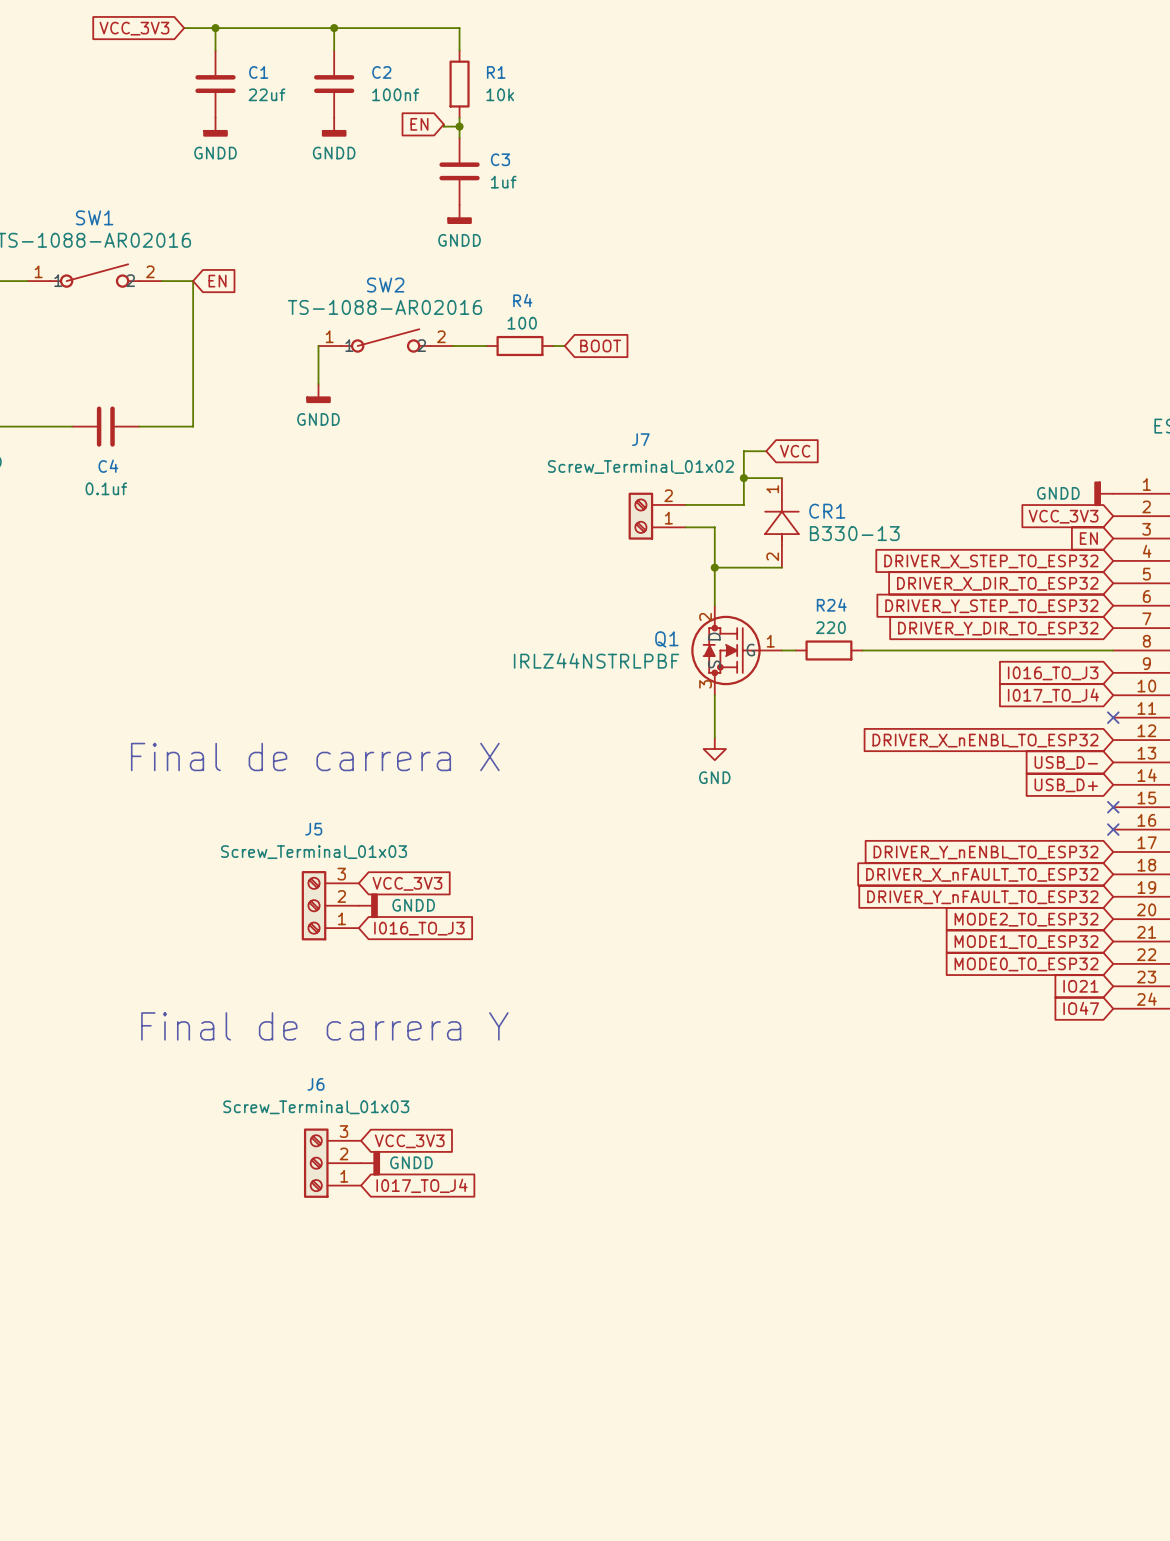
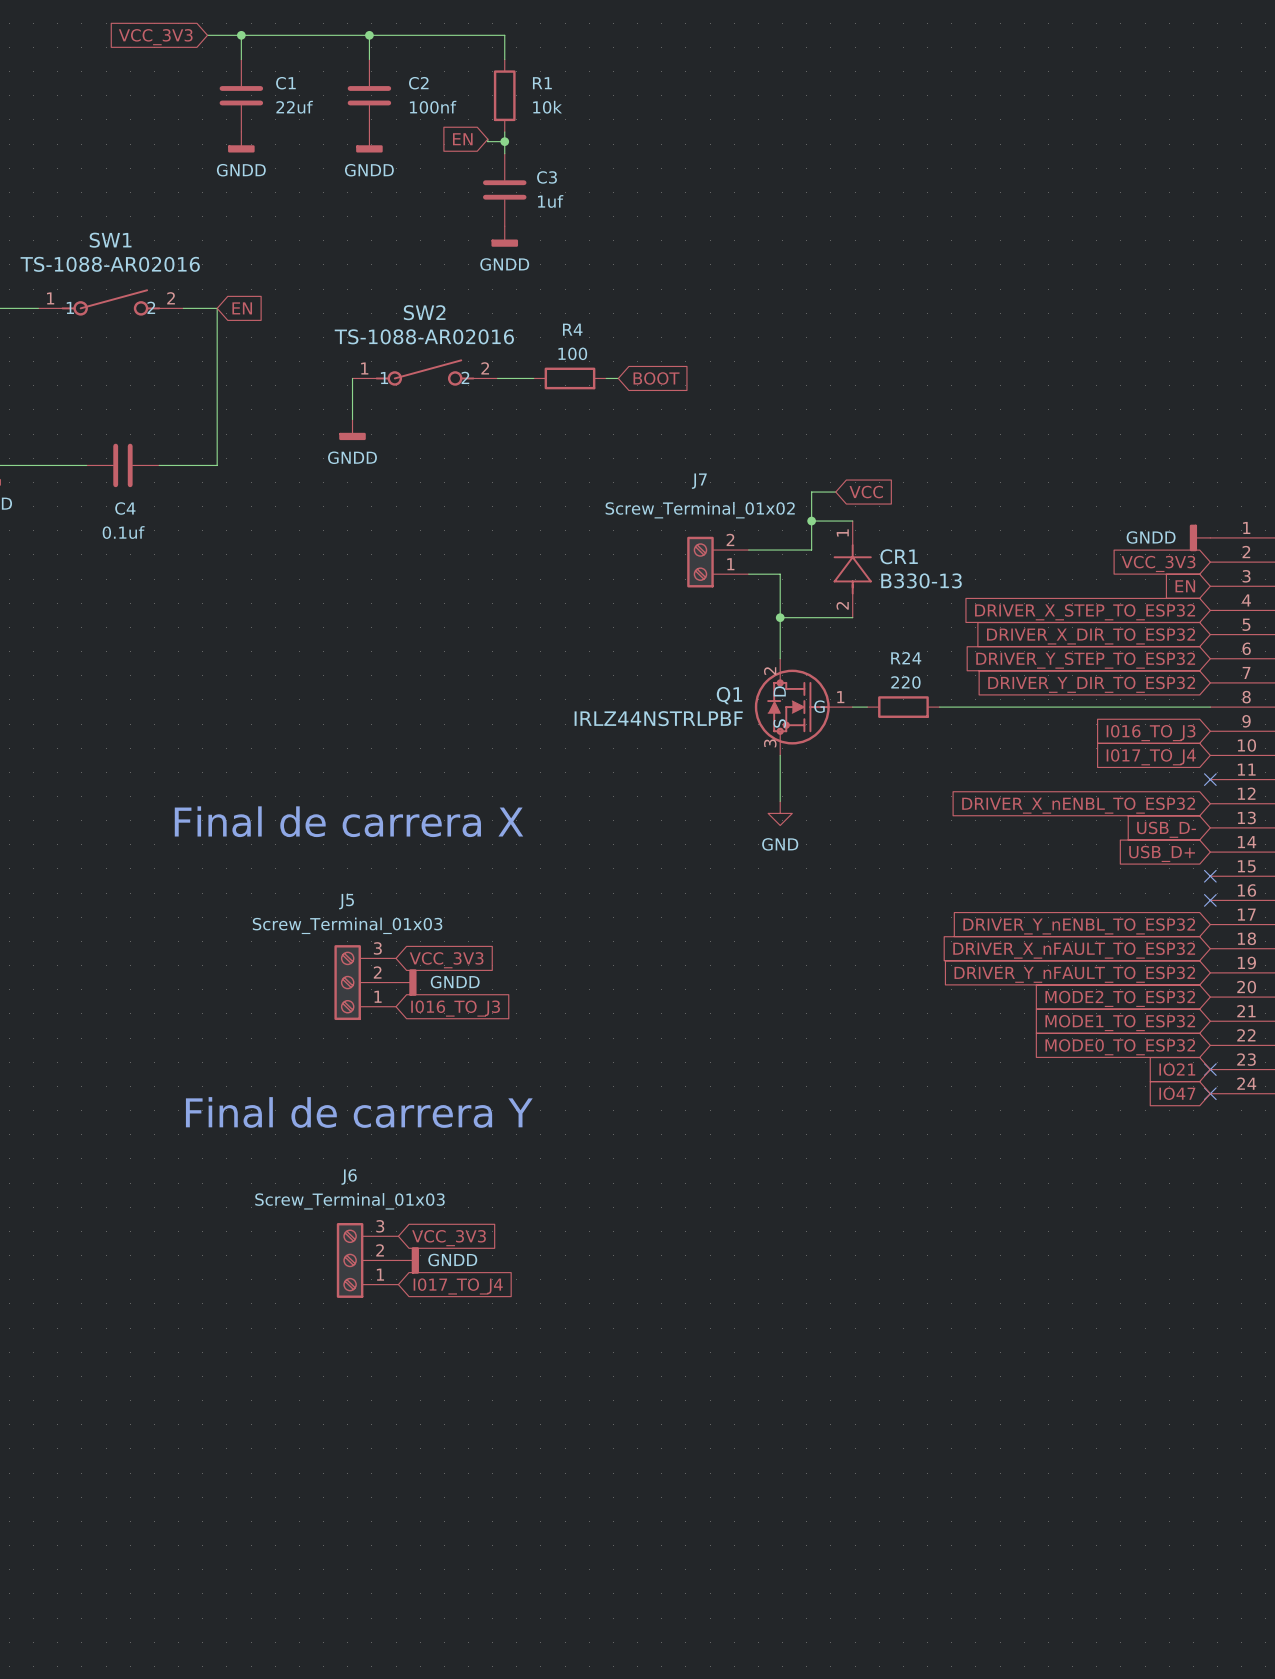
no-connect mark: none -> (1210, 1069)
no-connect mark: none -> (1210, 1093)

